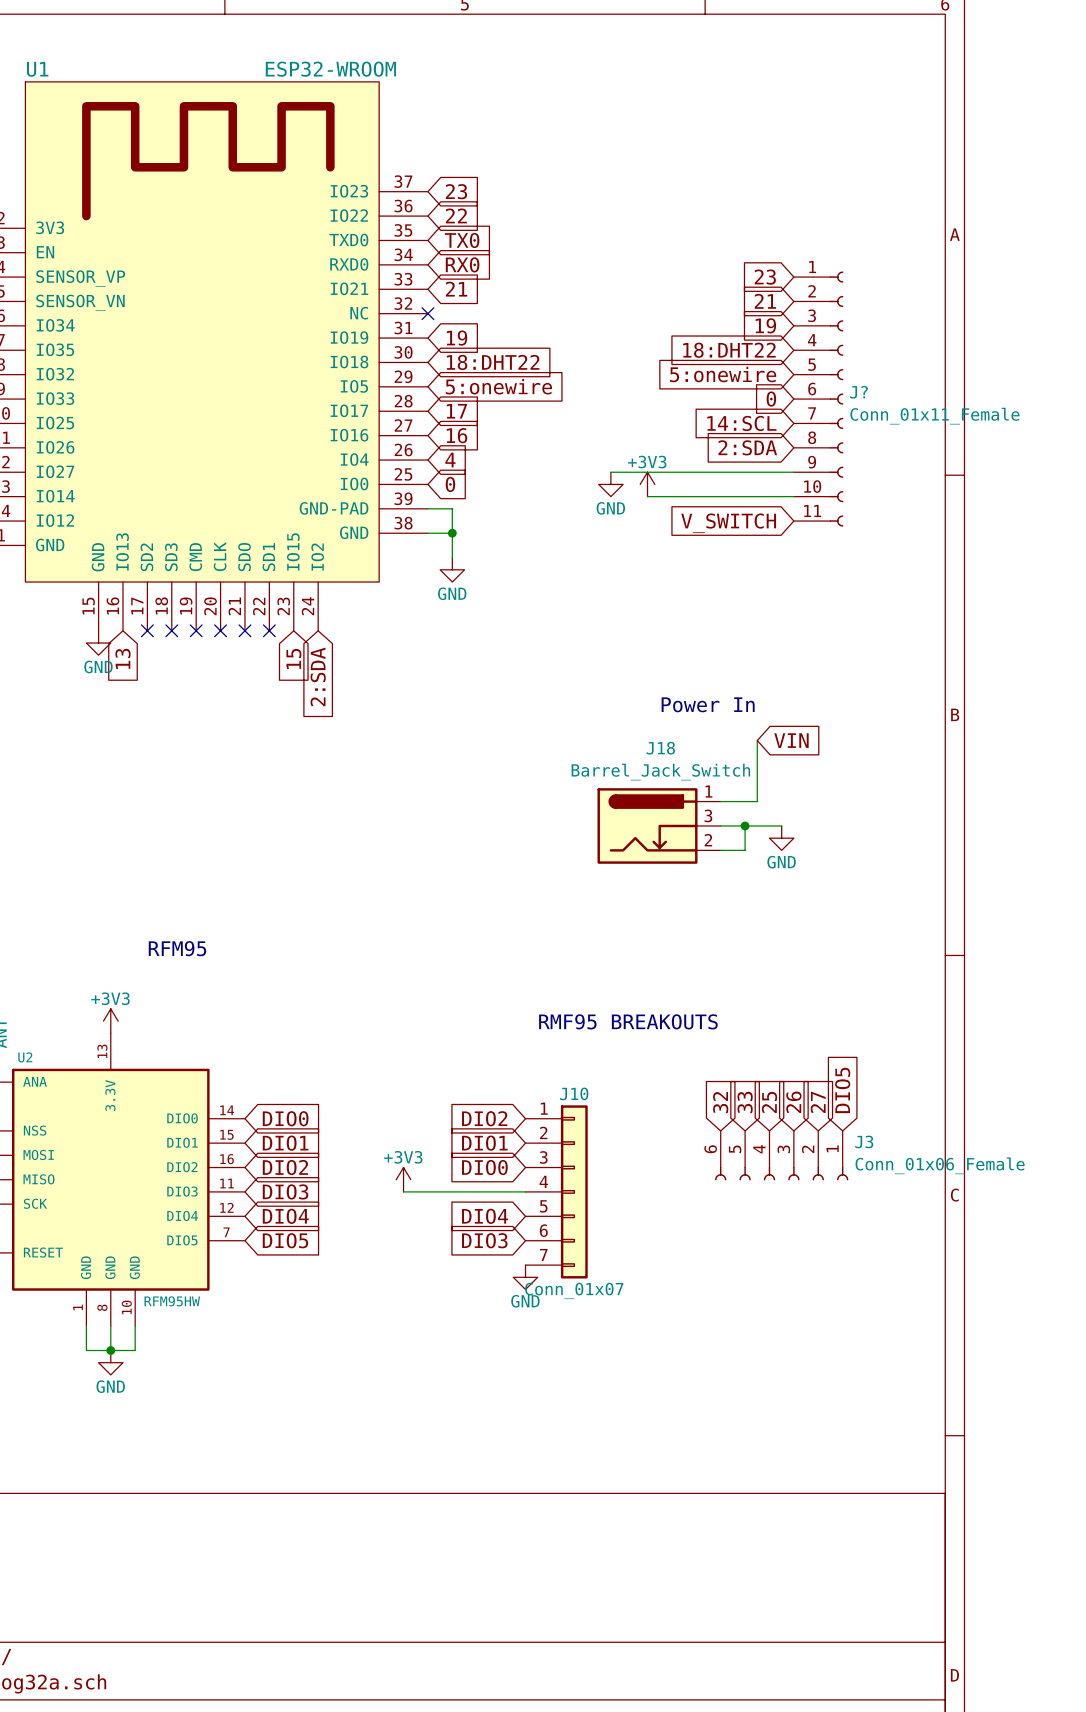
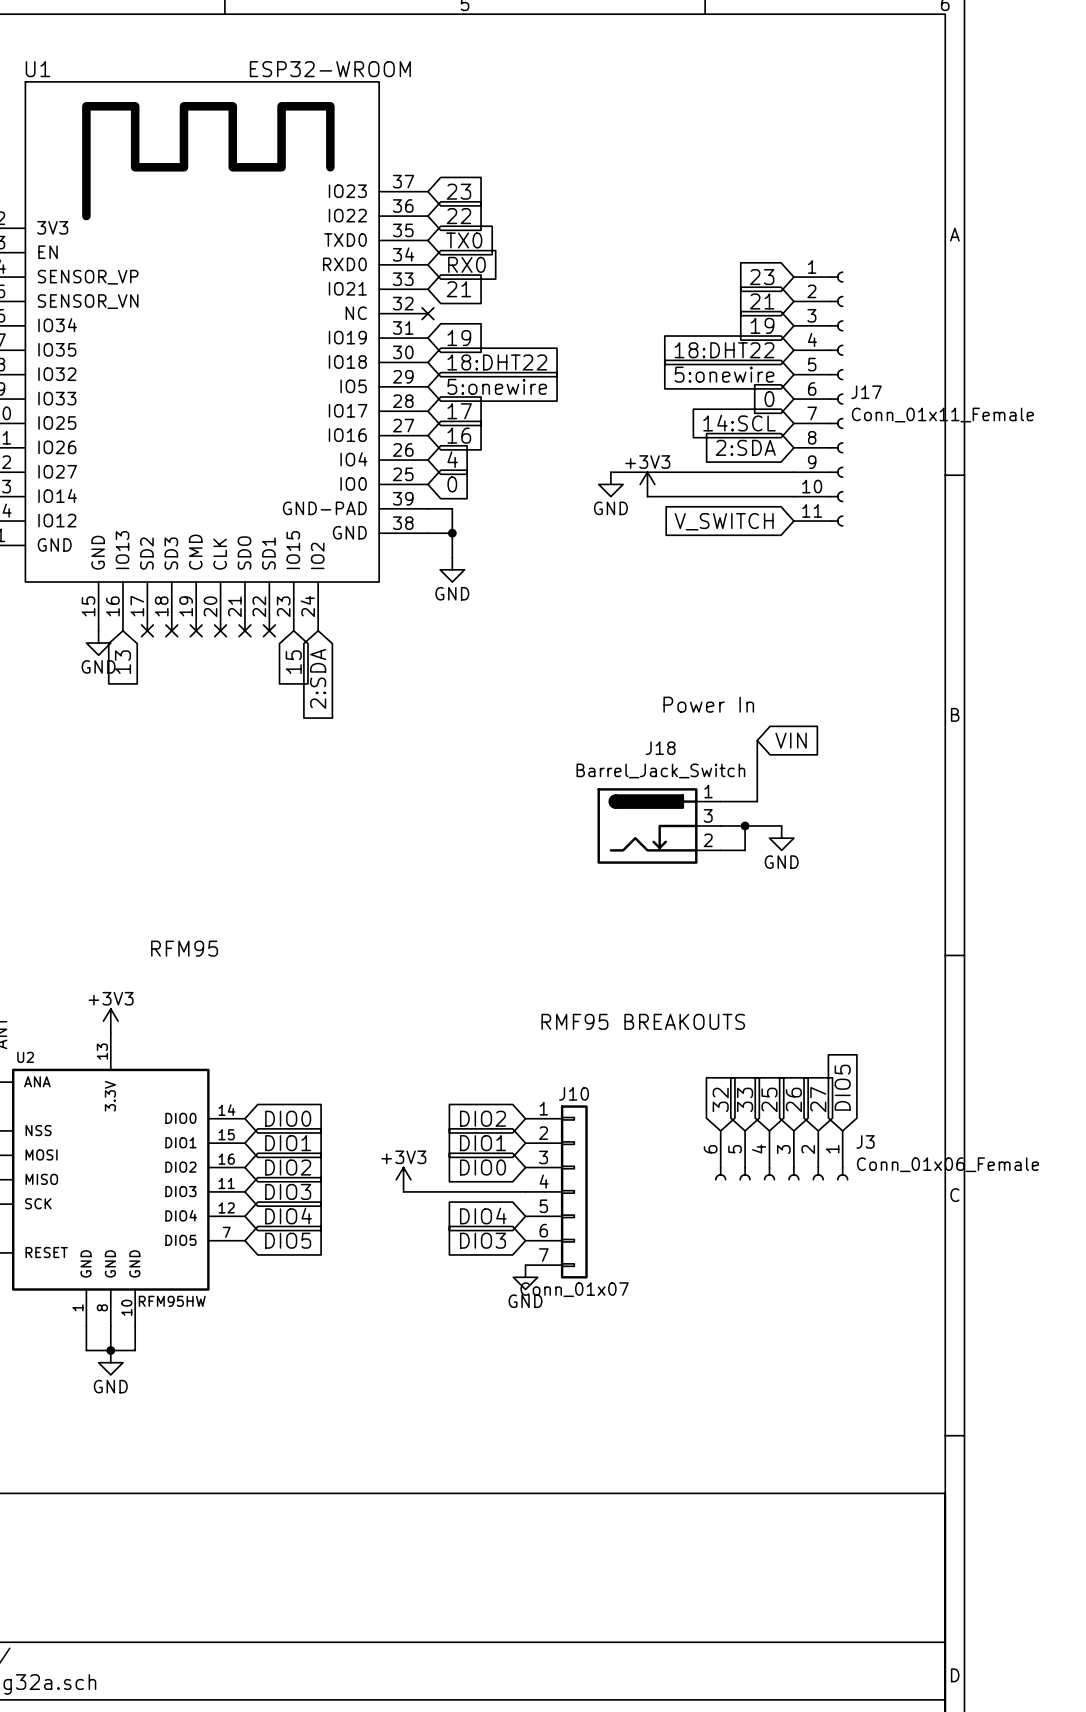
J? name: J? (858, 392) -> J17 (866, 392)

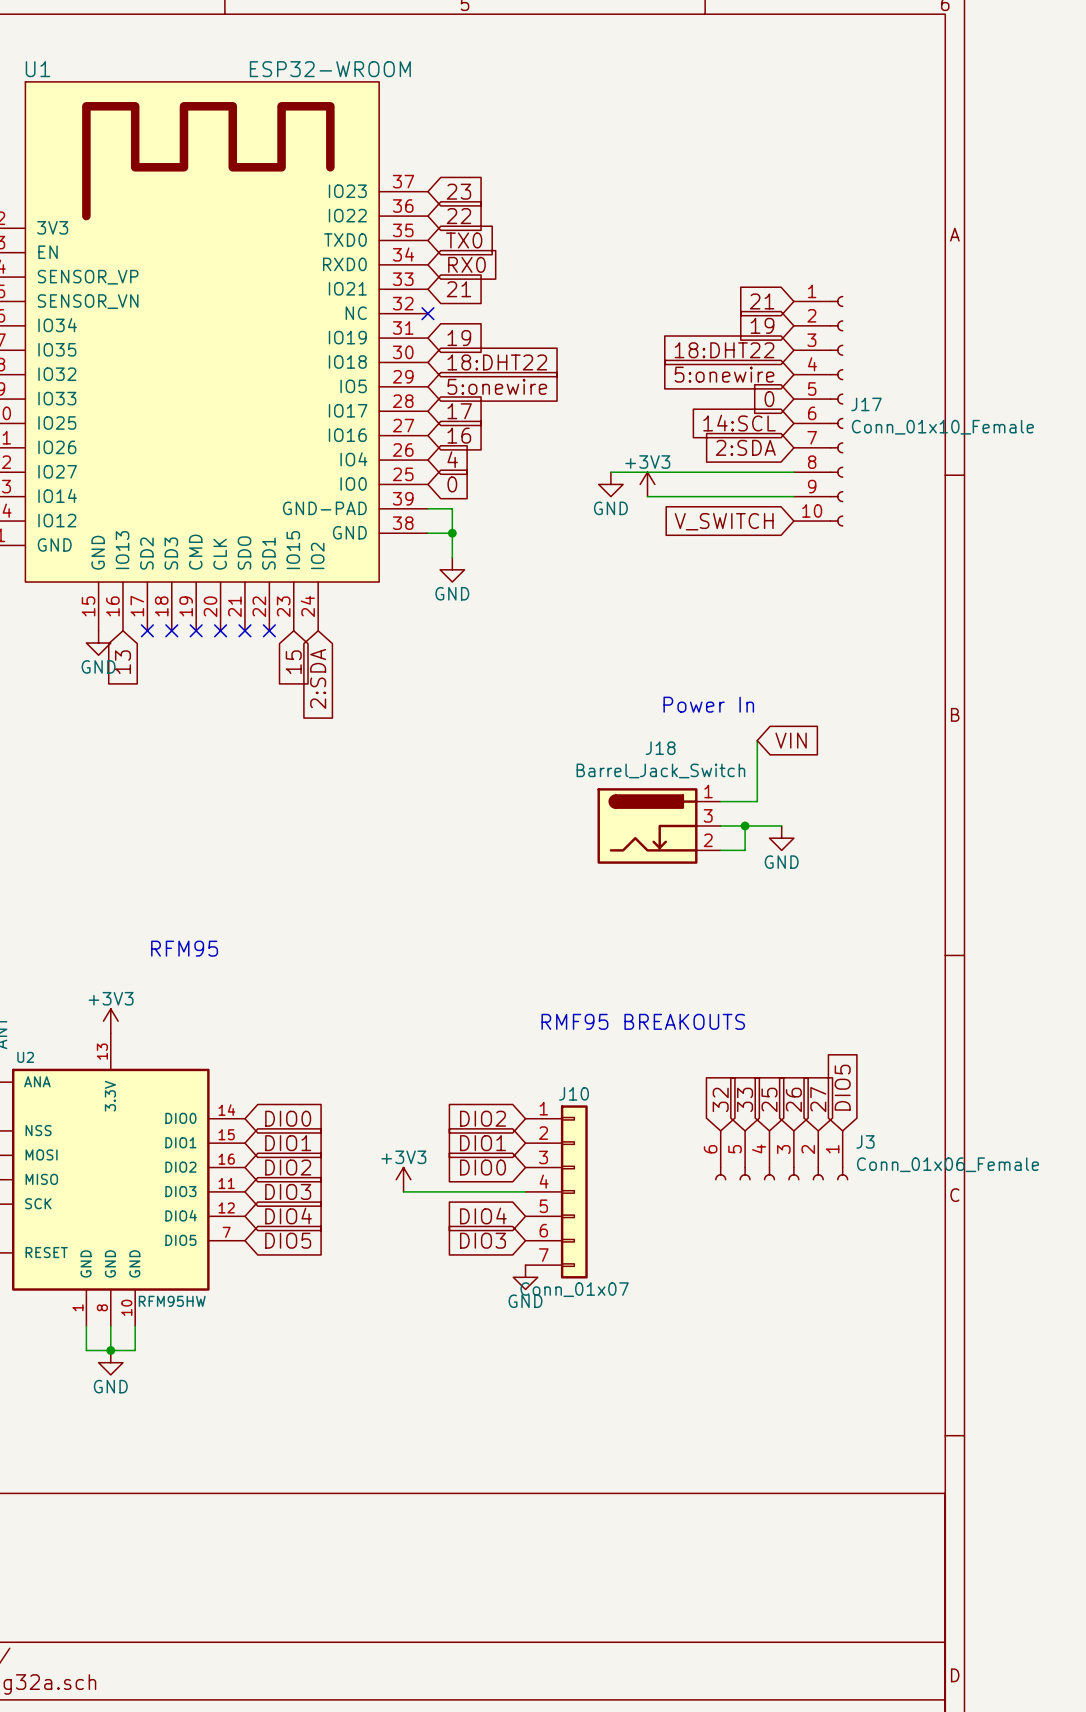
J17 symbol: [793, 271, 844, 527] -> [793, 295, 844, 527]
global label: 23 (762, 277) -> none
J17 value: Conn_01x11_Female (942, 415) -> Conn_01x10_Female (942, 427)

